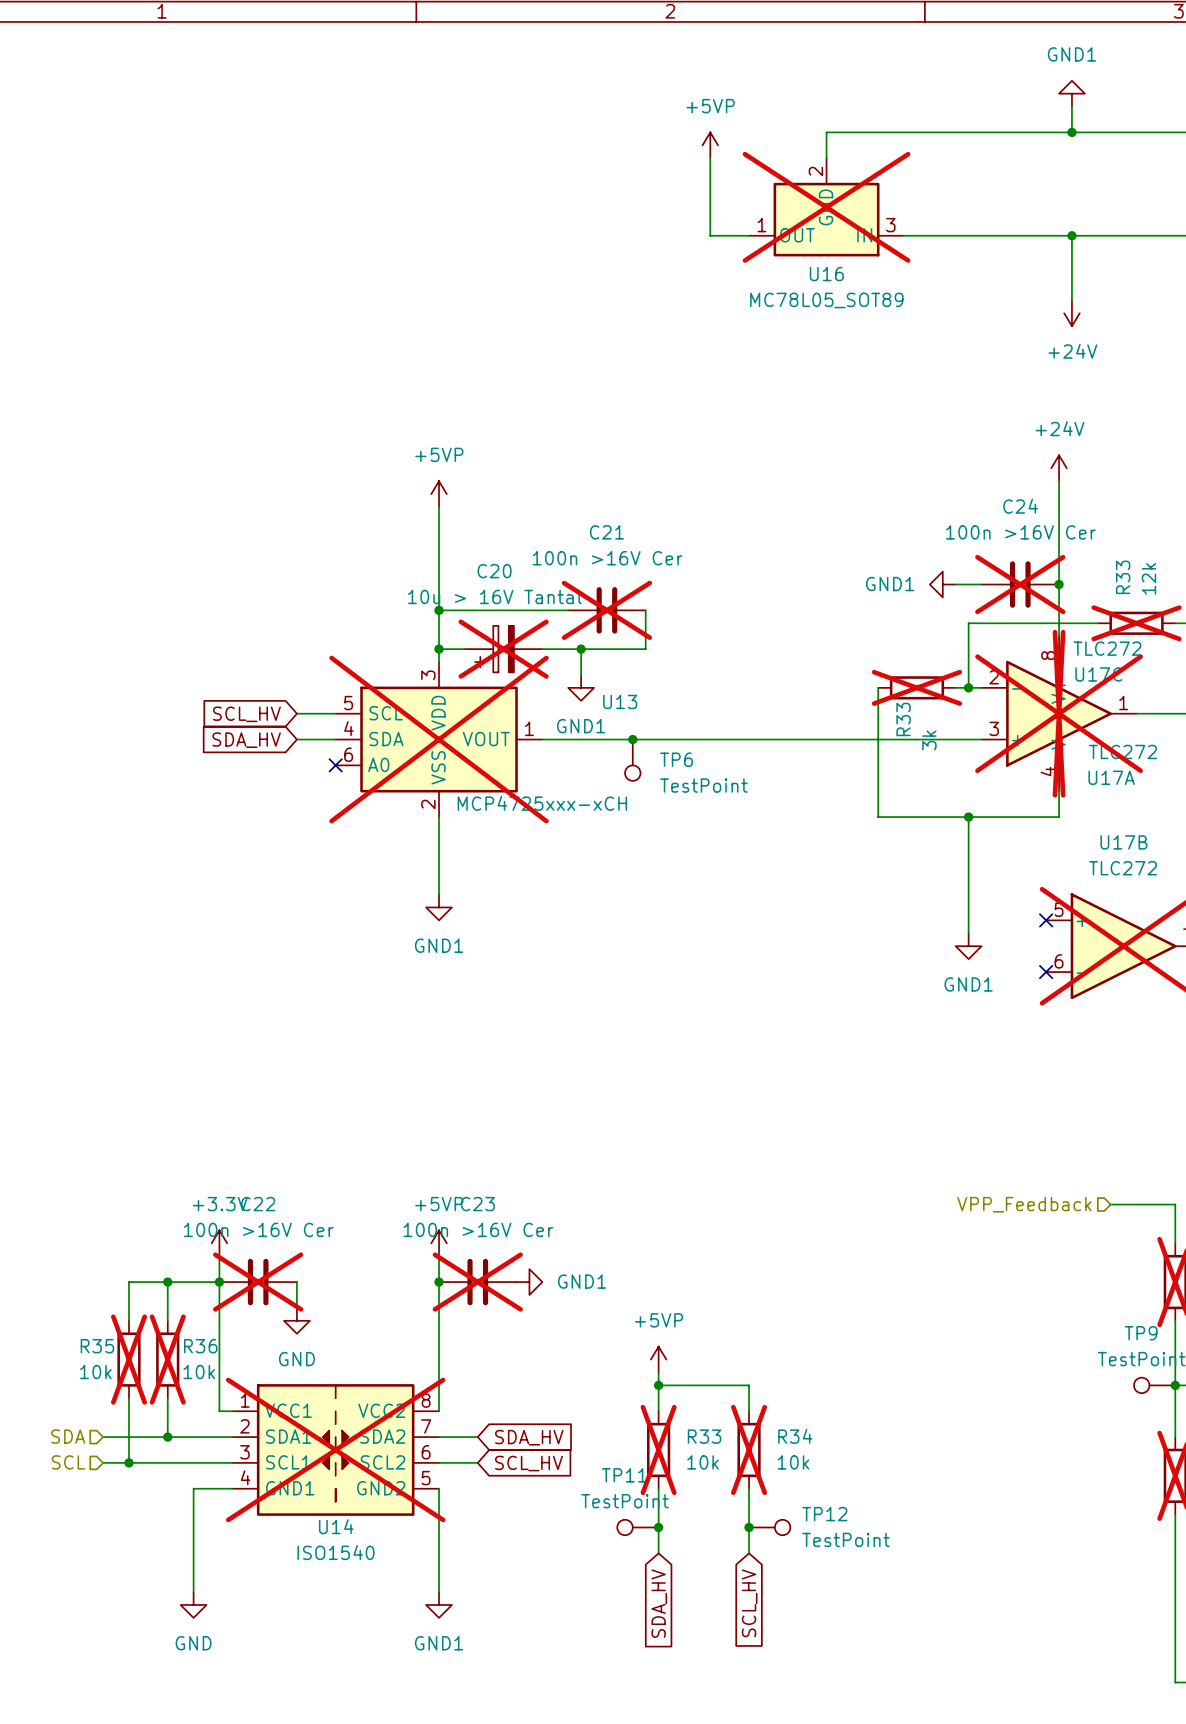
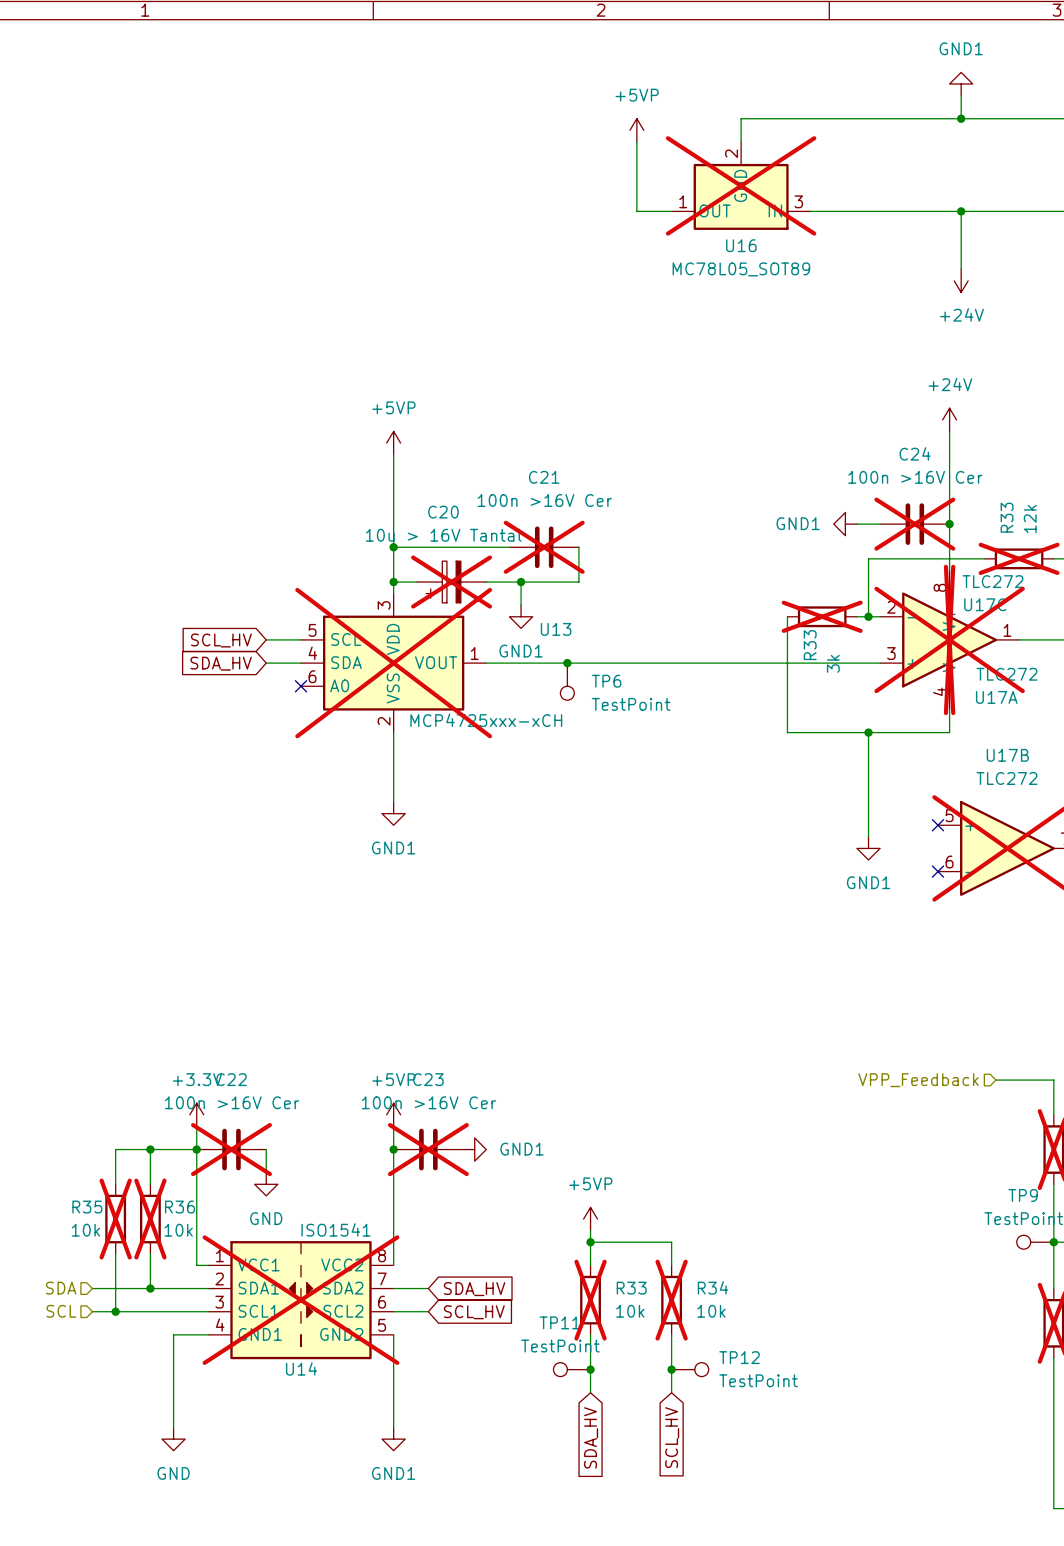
U14 symbol: [232, 1384, 440, 1516] -> [208, 1241, 394, 1360]
U14 value: ISO1540 (335, 1552) -> ISO1541 (336, 1229)

